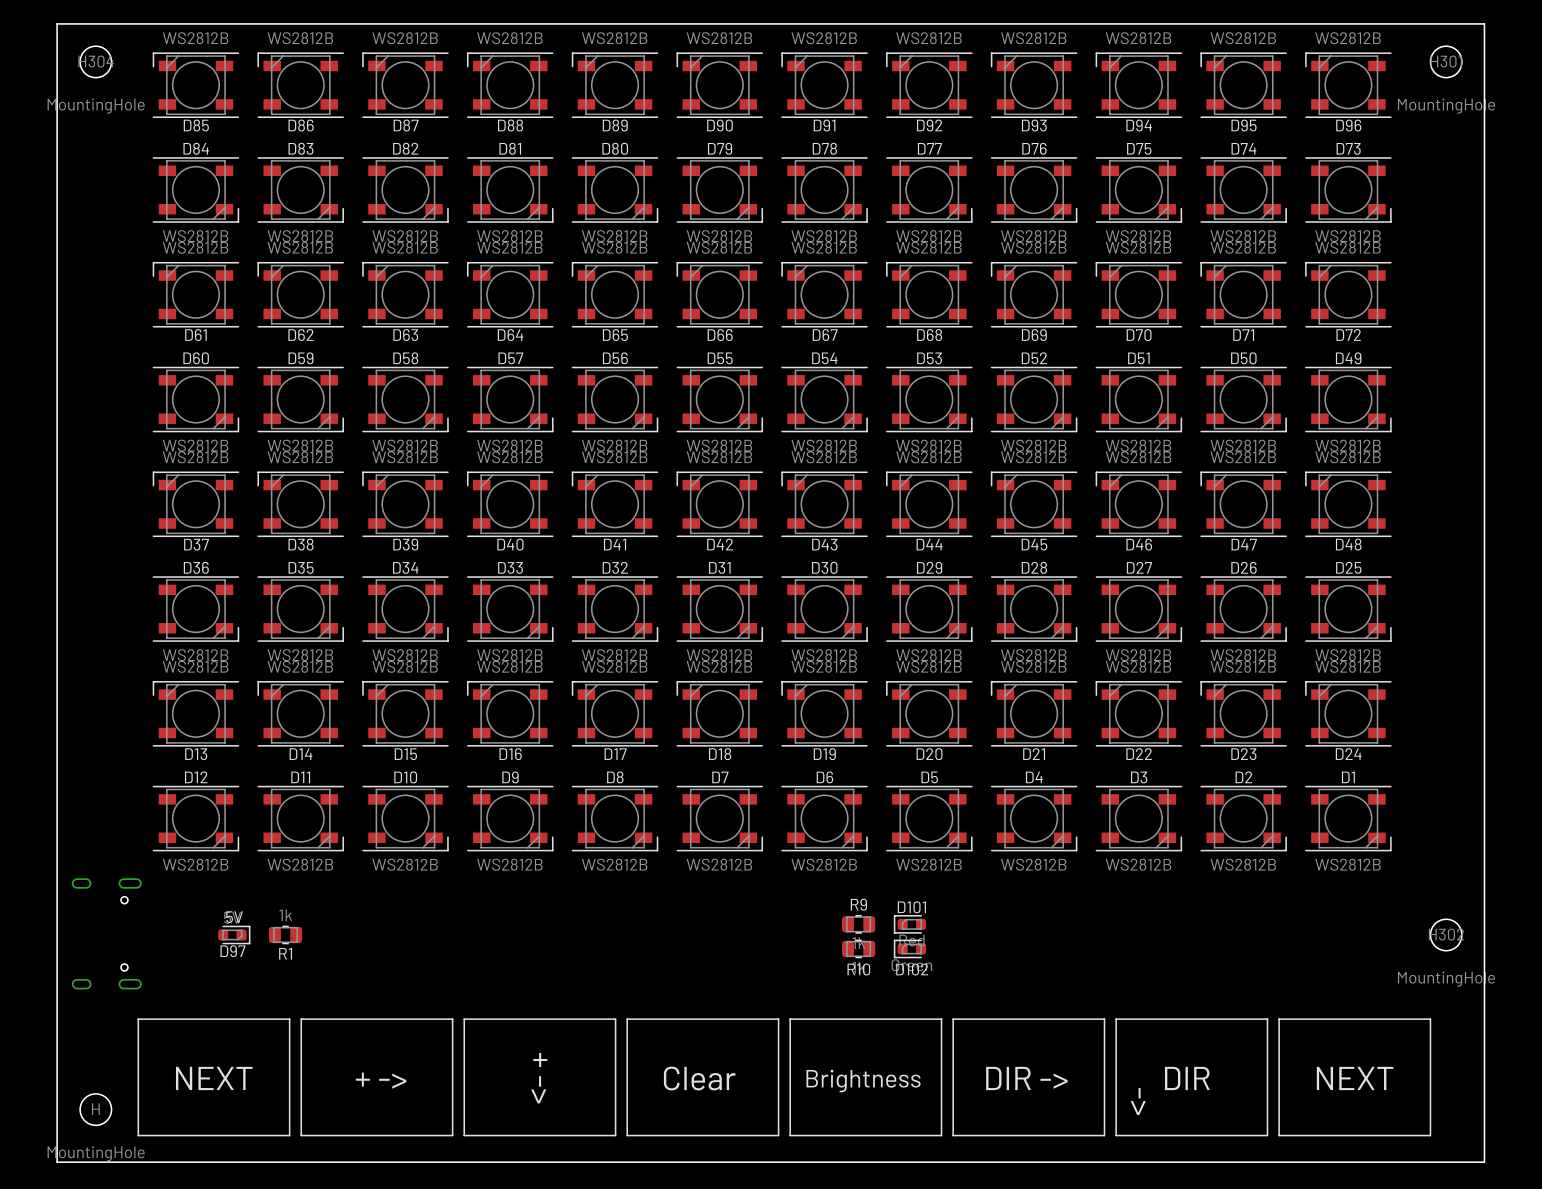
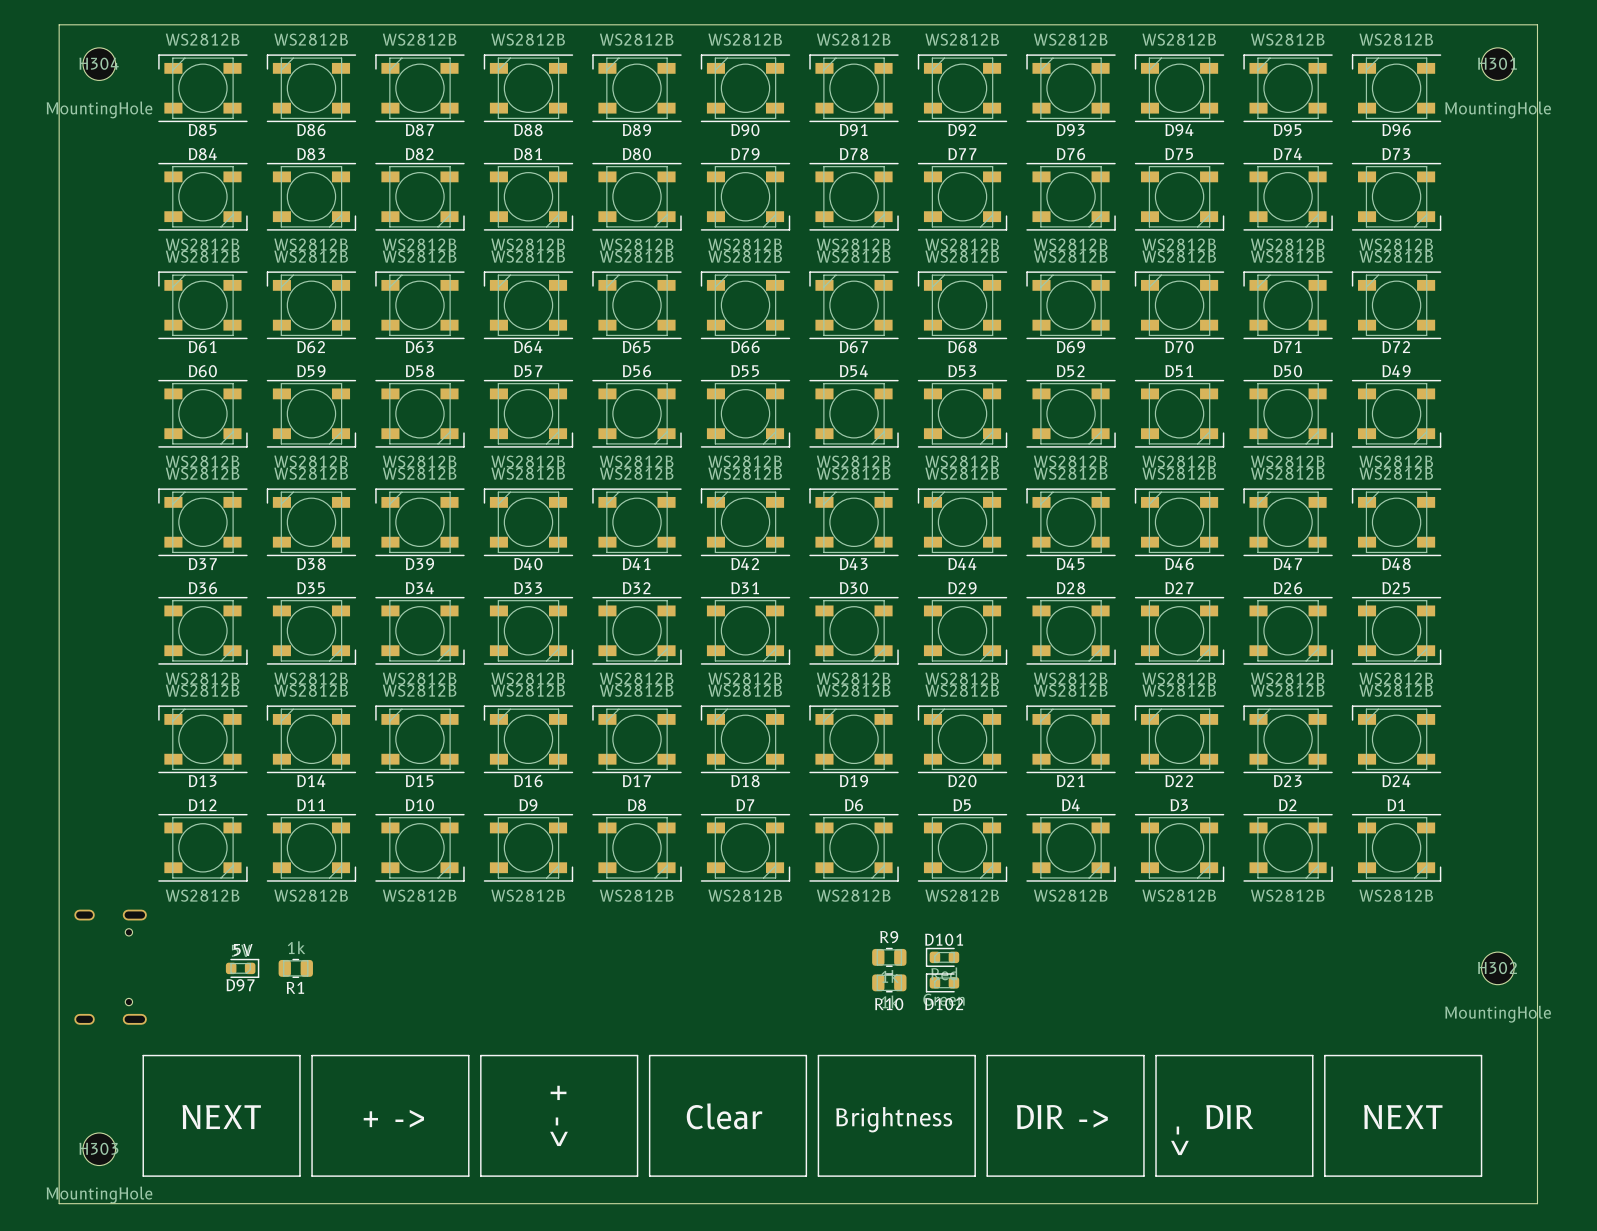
H name: H (95, 1109) -> H303 (98, 1148)

